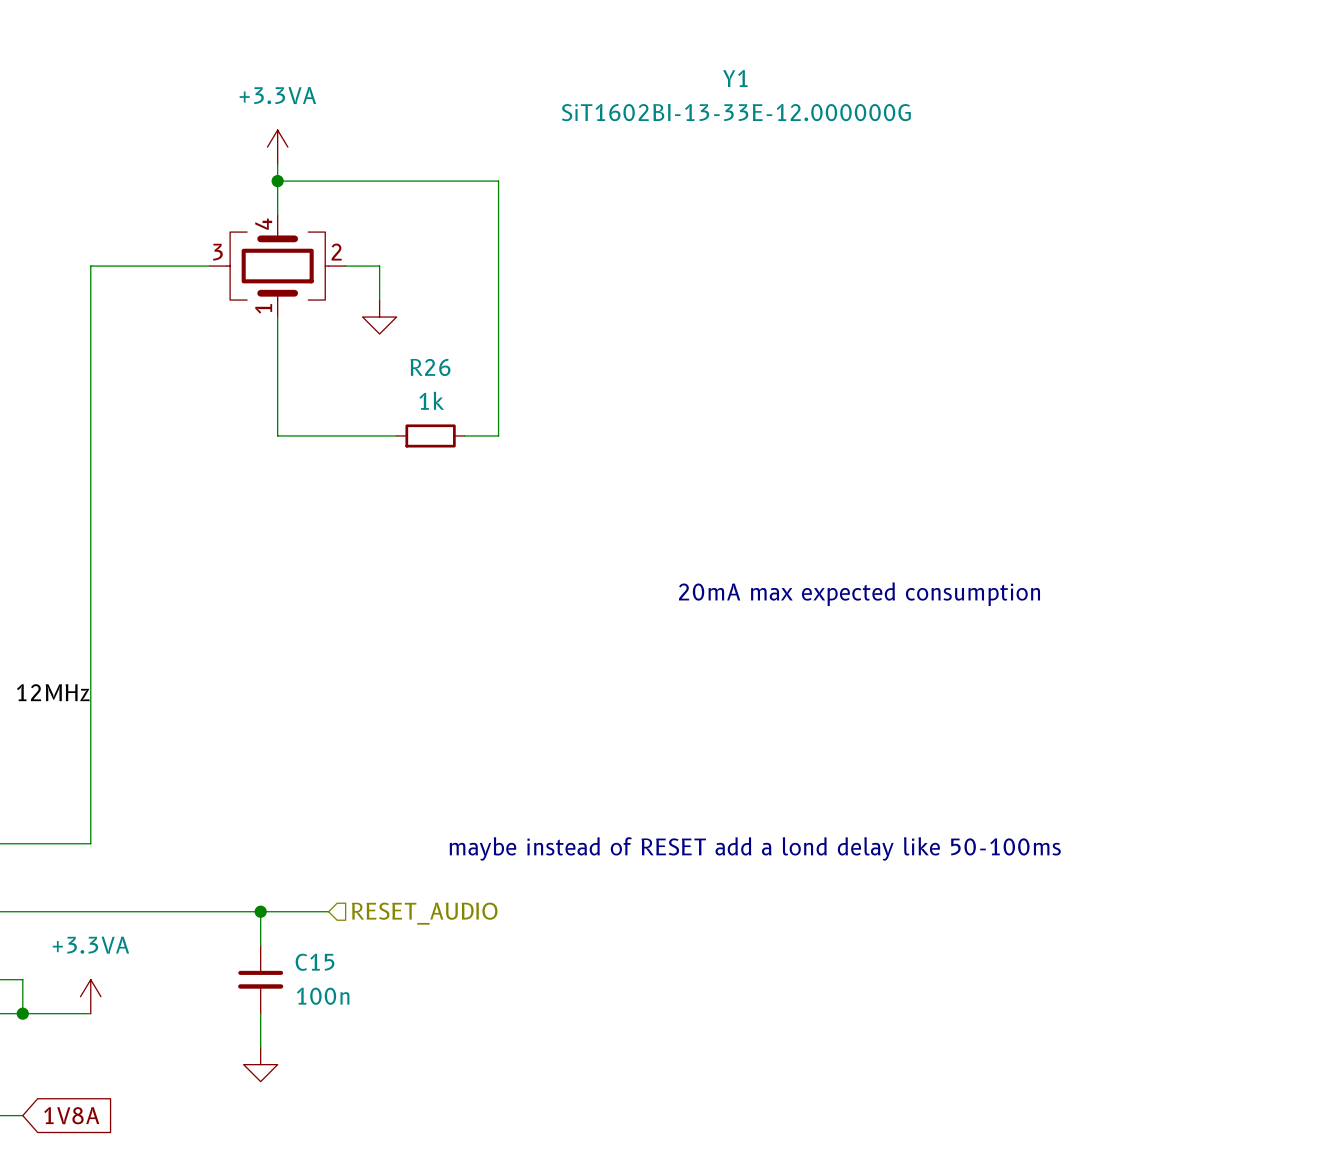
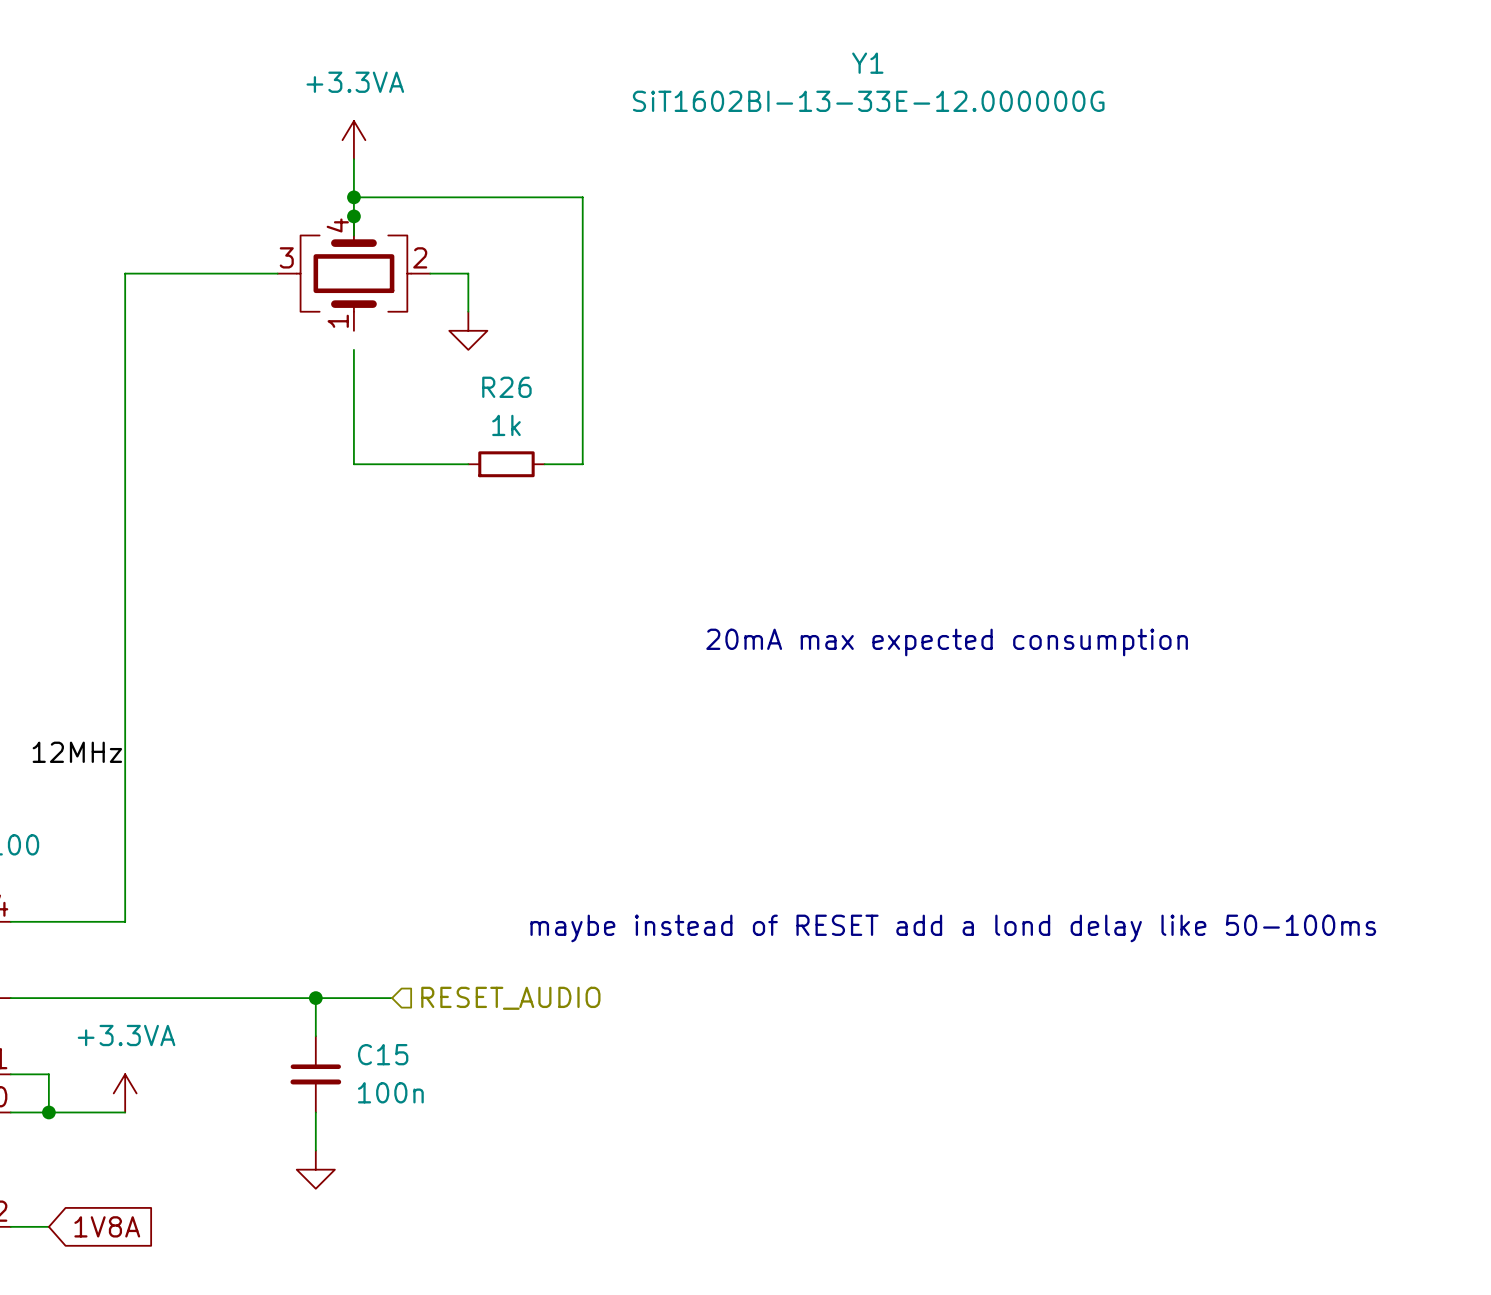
power symbol position: +3.3VA (277, 147) -> +3.3VA (353, 140)
wire: (277, 164) (277, 215) -> none
wire: none -> (353, 159) (353, 235)
wire: (277, 181) (498, 181) (498, 198) -> (353, 197) (582, 197)
junction: (277, 181) -> none
junction: none -> (353, 197)
junction: none -> (353, 216)
Y1 position: (277, 266) -> (353, 273)
wire: (379, 266) (379, 300) -> (449, 273) (468, 273) (468, 311)
wire: (277, 317) (277, 435) (294, 435) -> (353, 349) (353, 464)
power symbol position: (379, 317) -> (468, 330)

